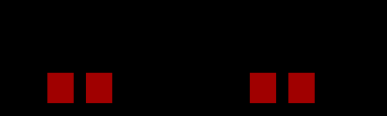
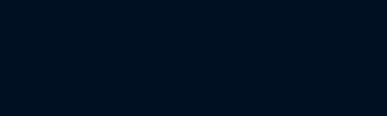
part: (79, 87) -> none
part: (282, 87) -> none

